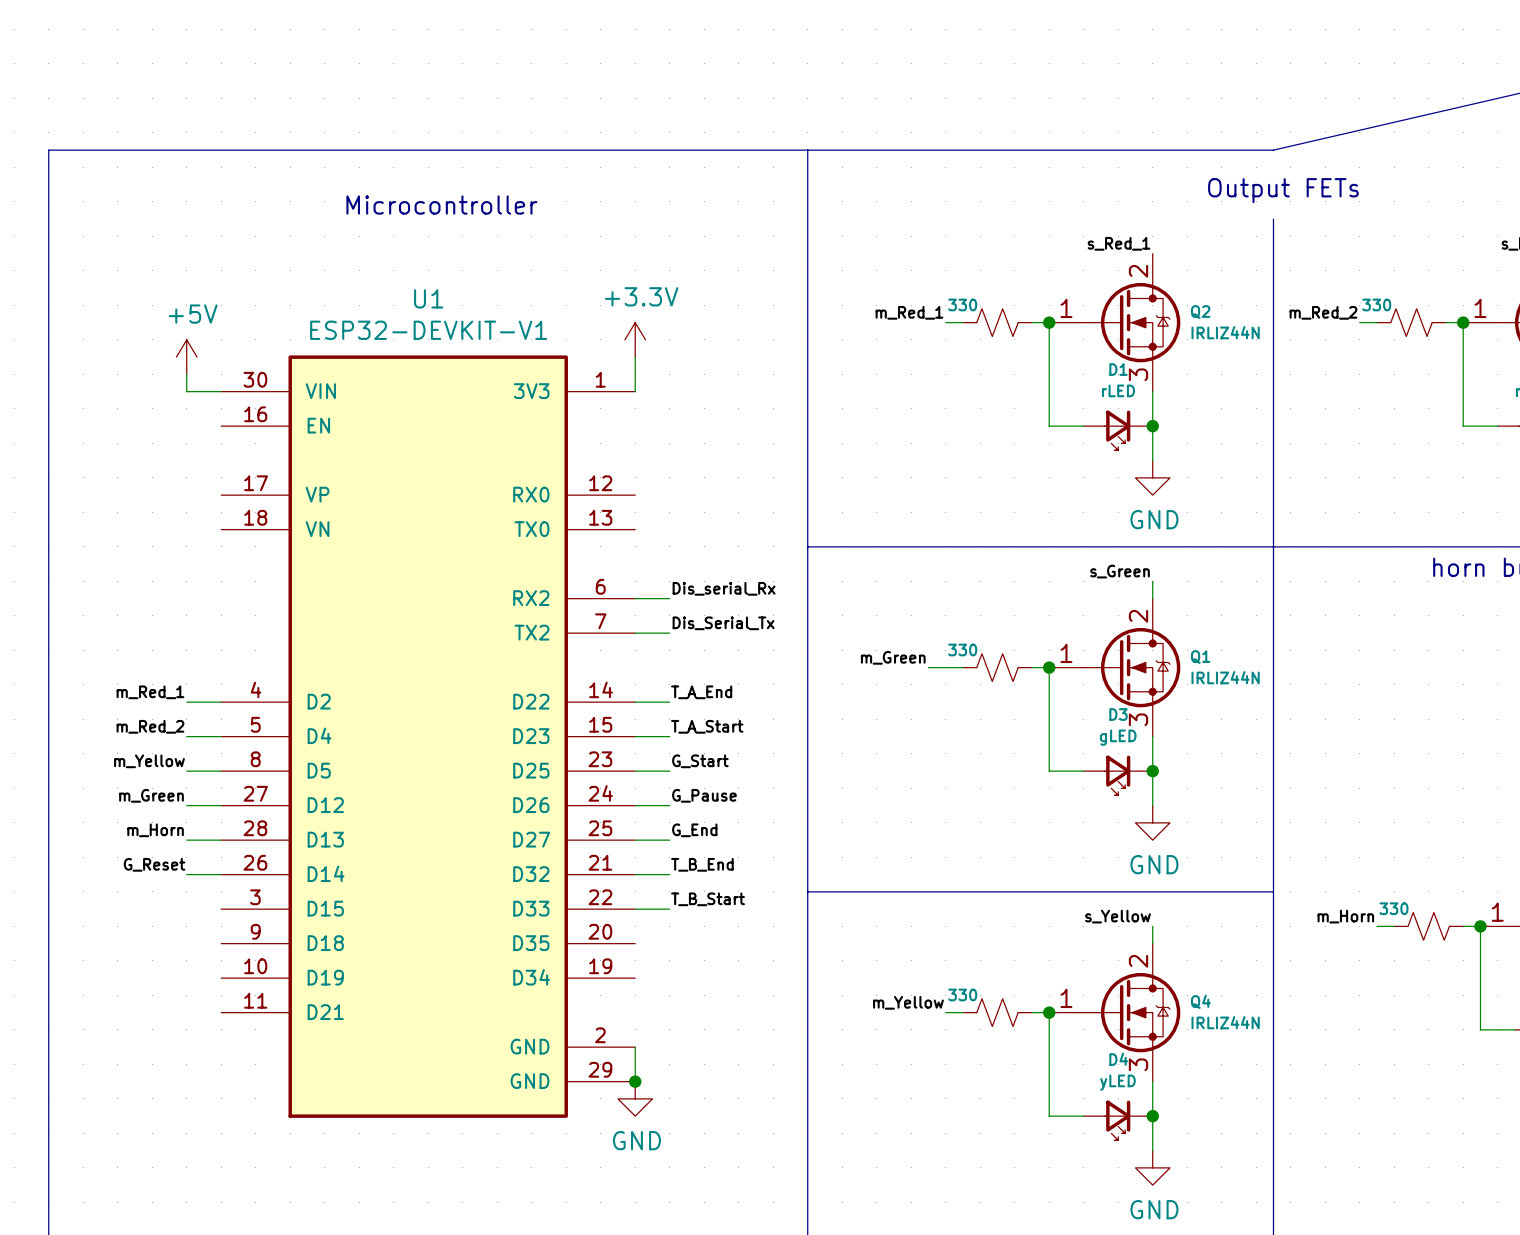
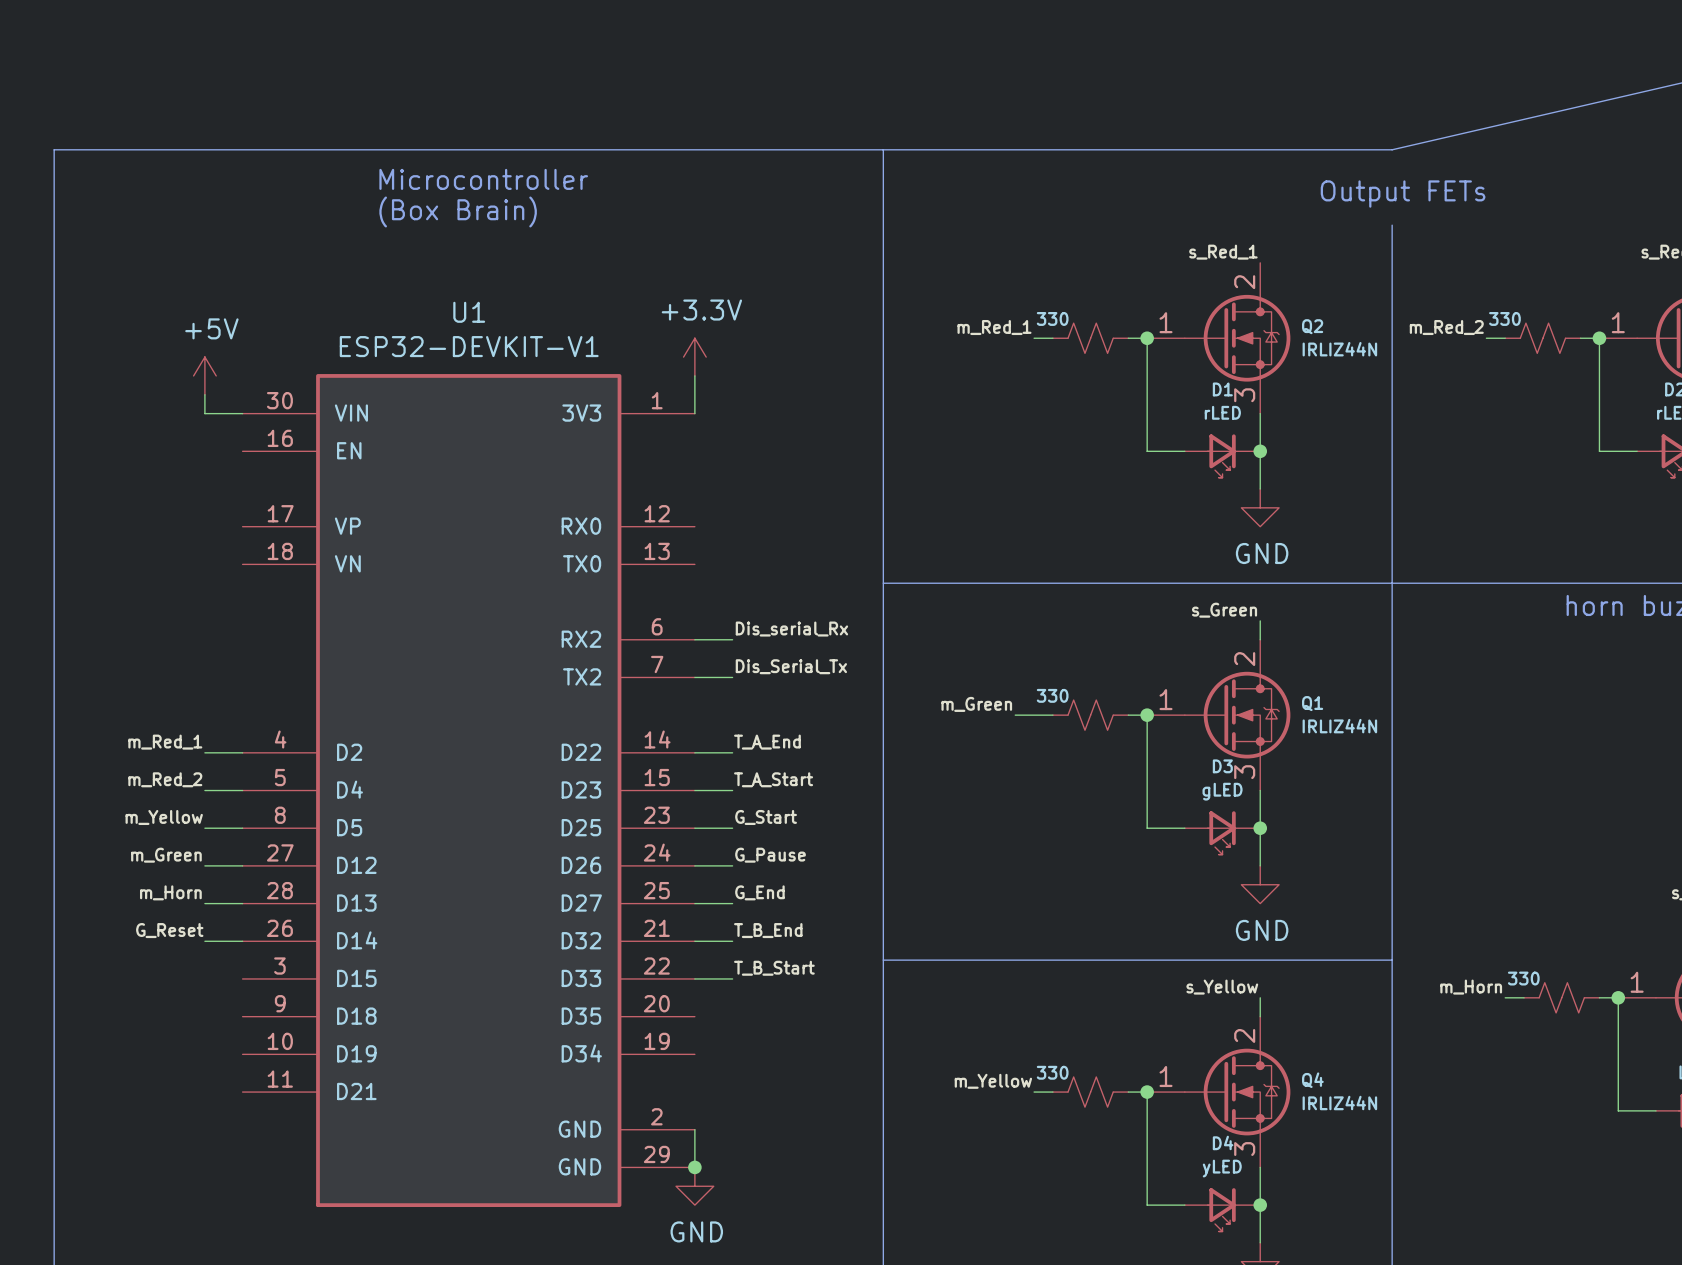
text: none -> Microcontroller (483, 179)
text: Microcontroller (441, 205) -> (Box Brain) (458, 211)

